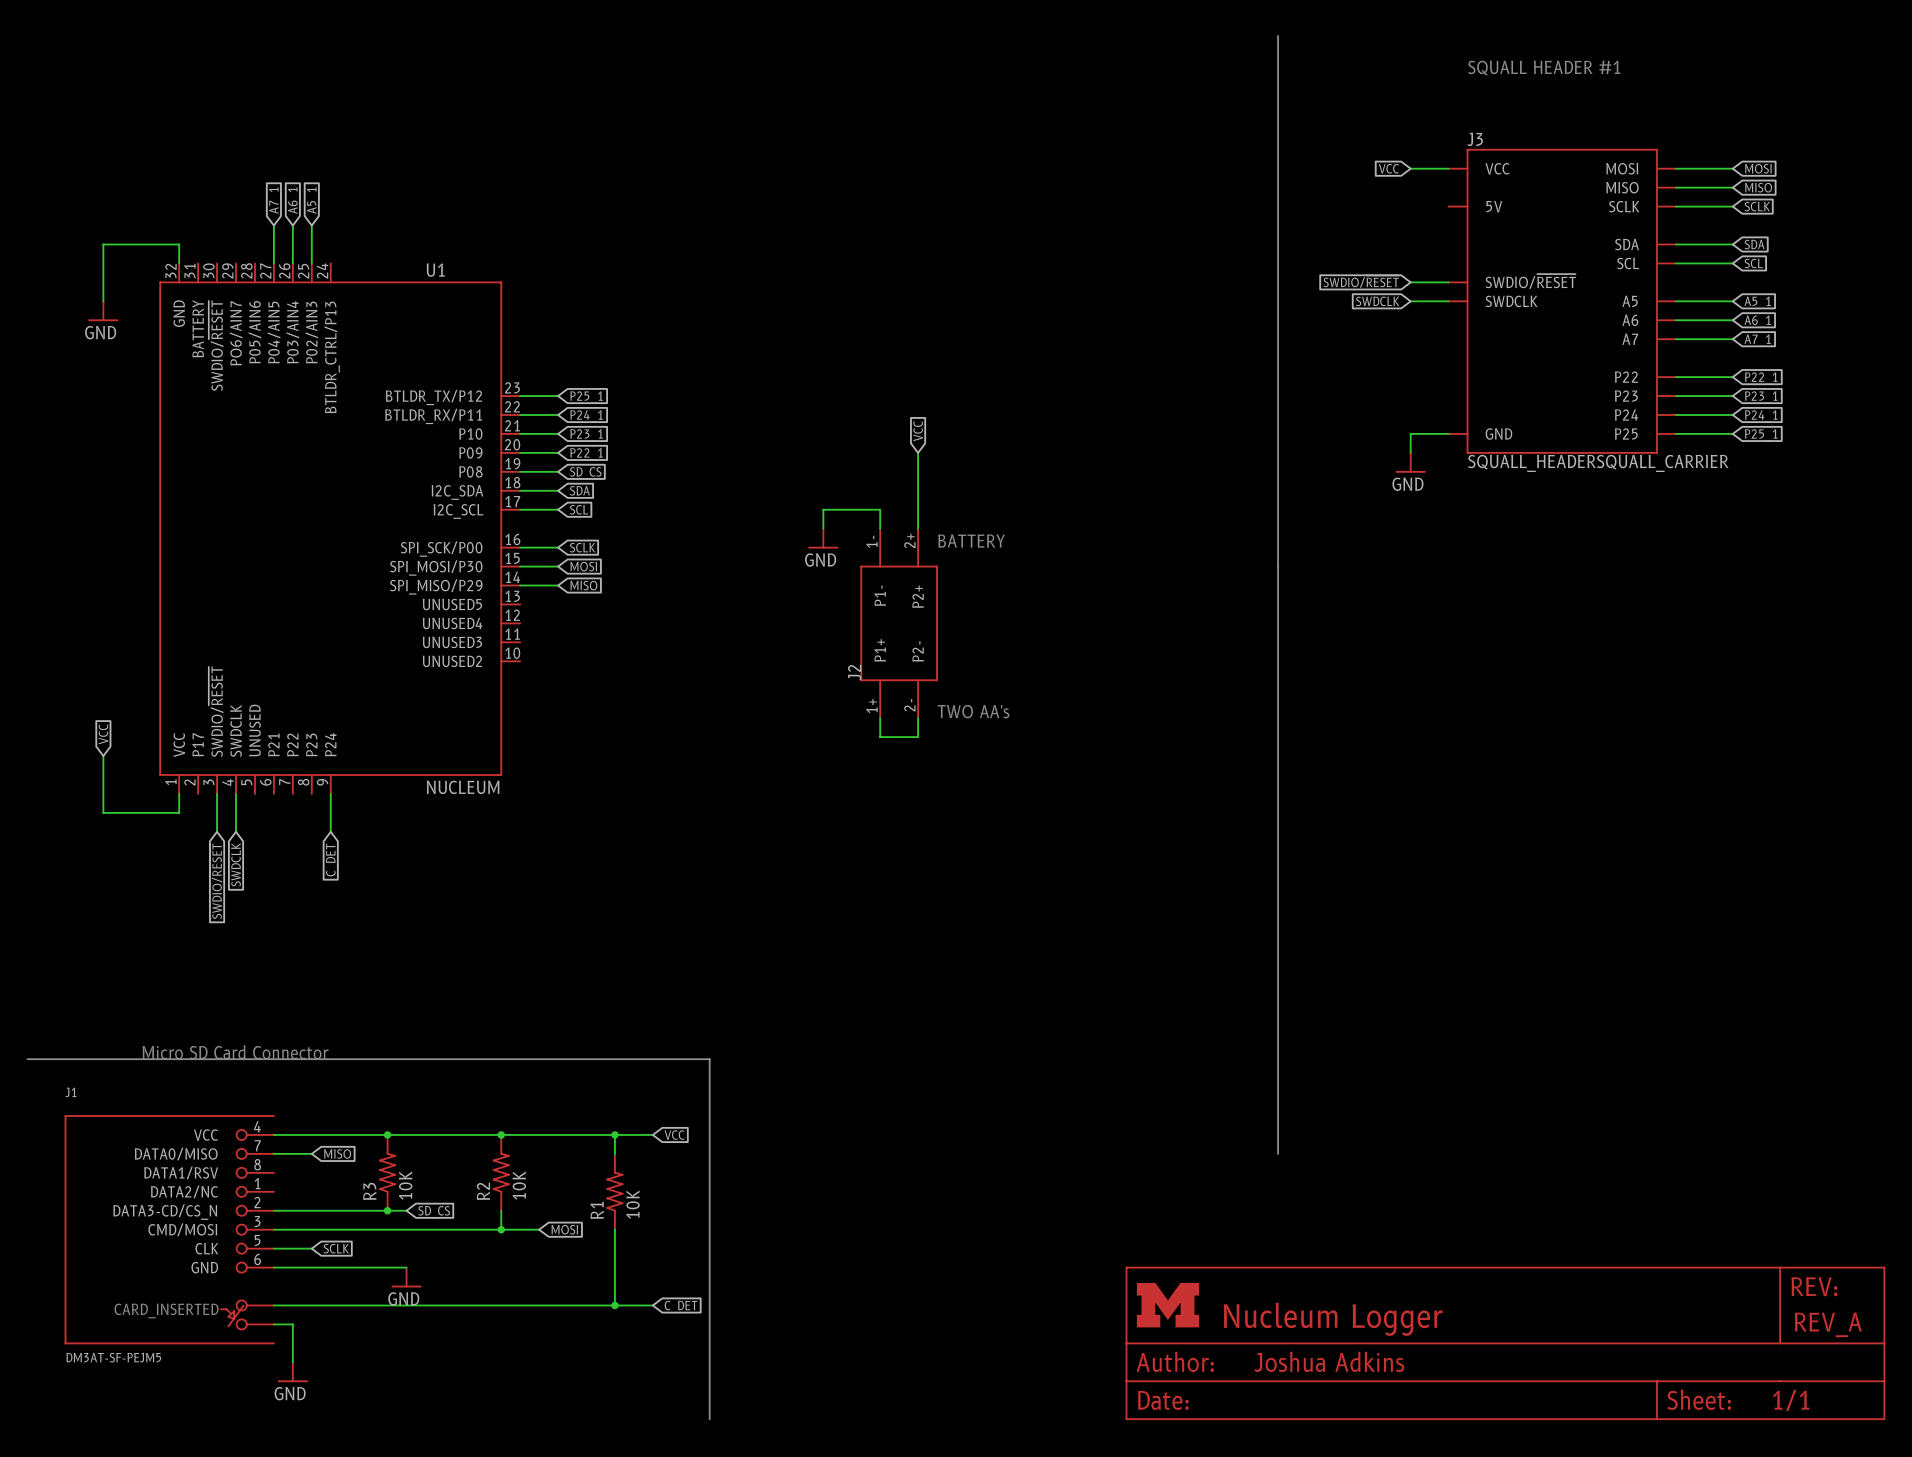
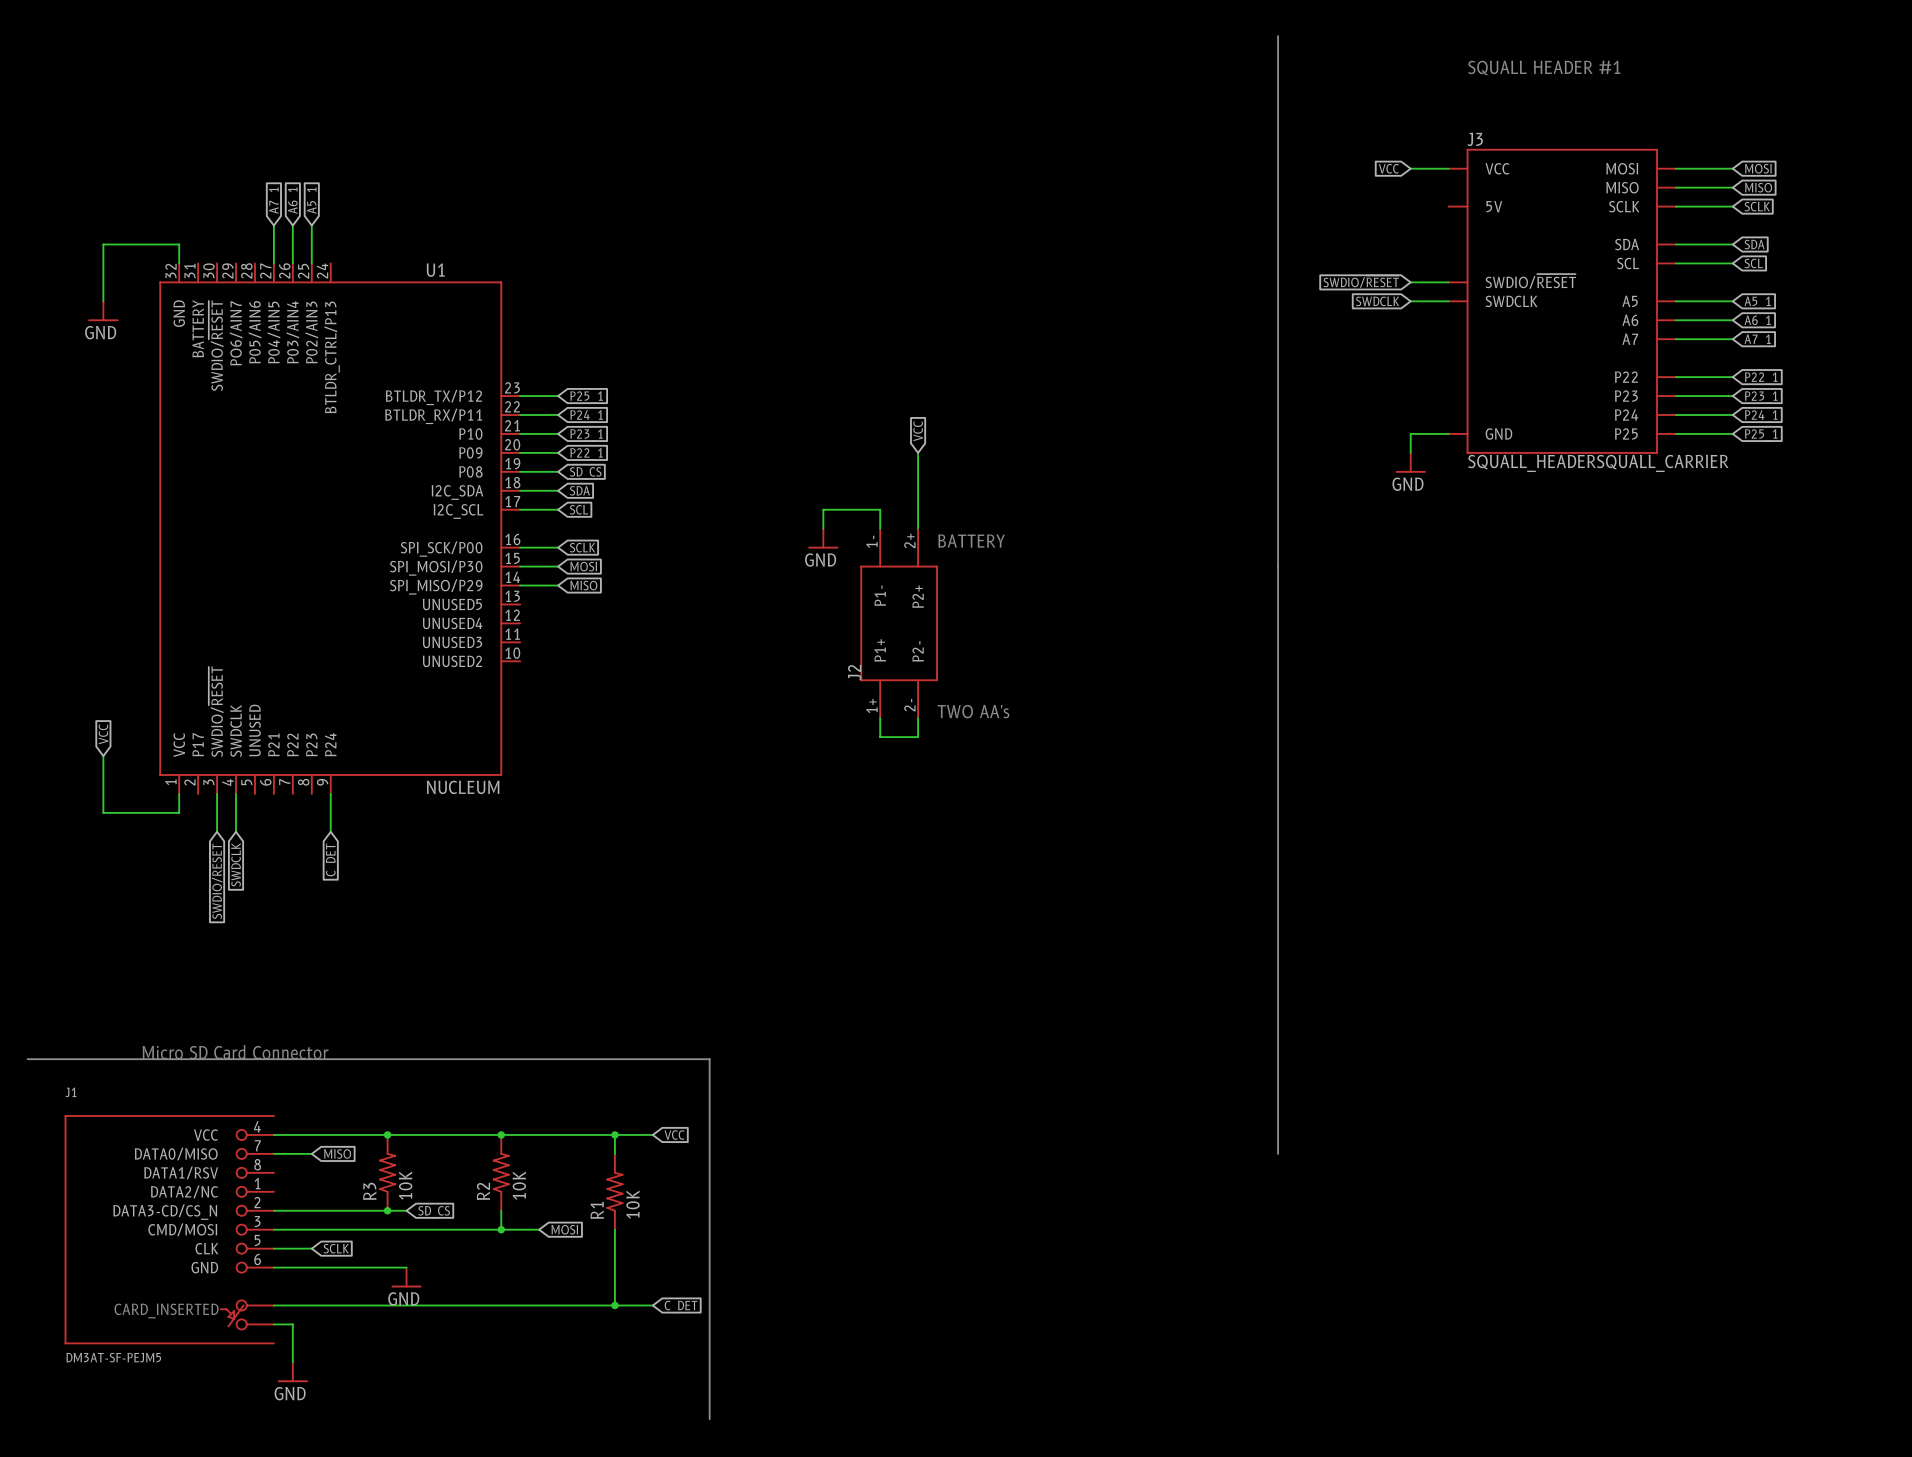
part: (1505, 1343) -> none

